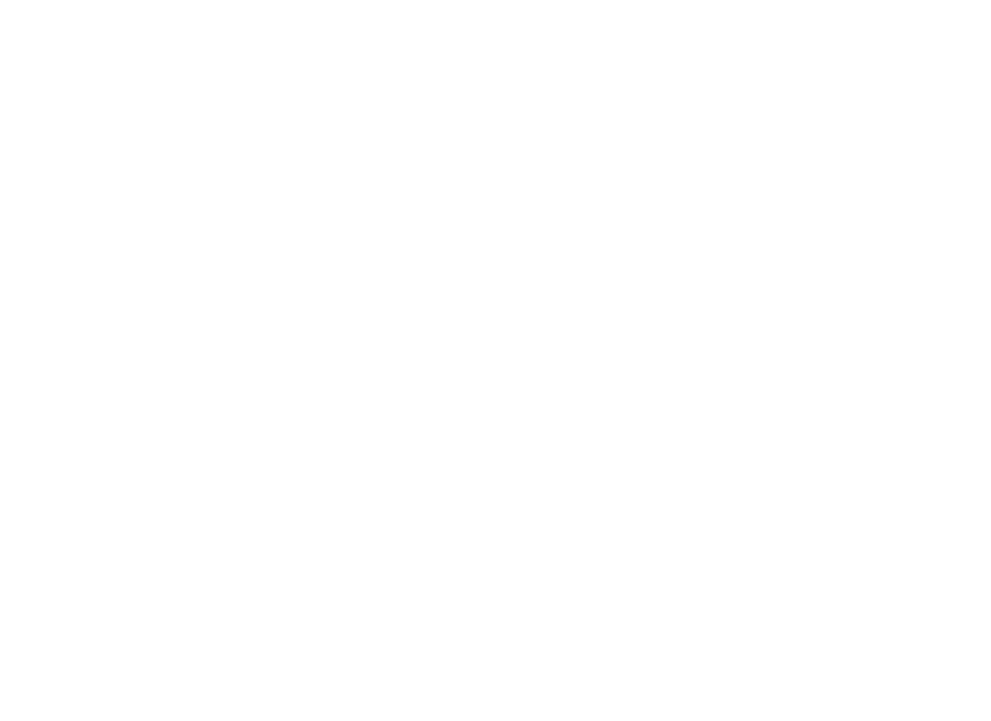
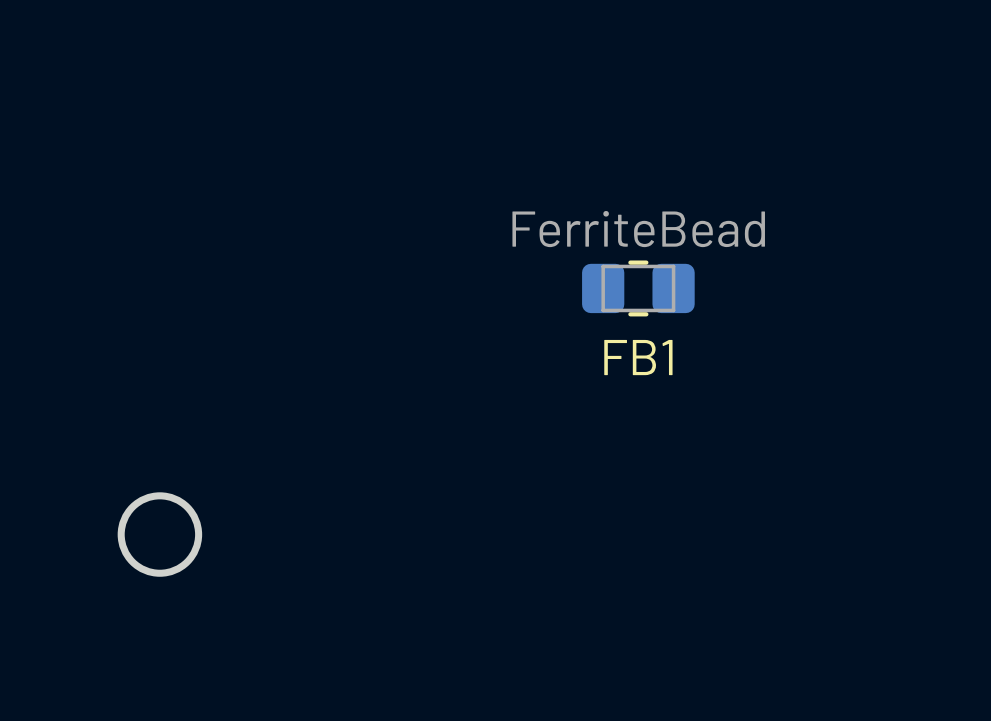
FB1: none -> FerriteBead (638, 288)
round board edge: none -> [117, 492, 203, 577]

